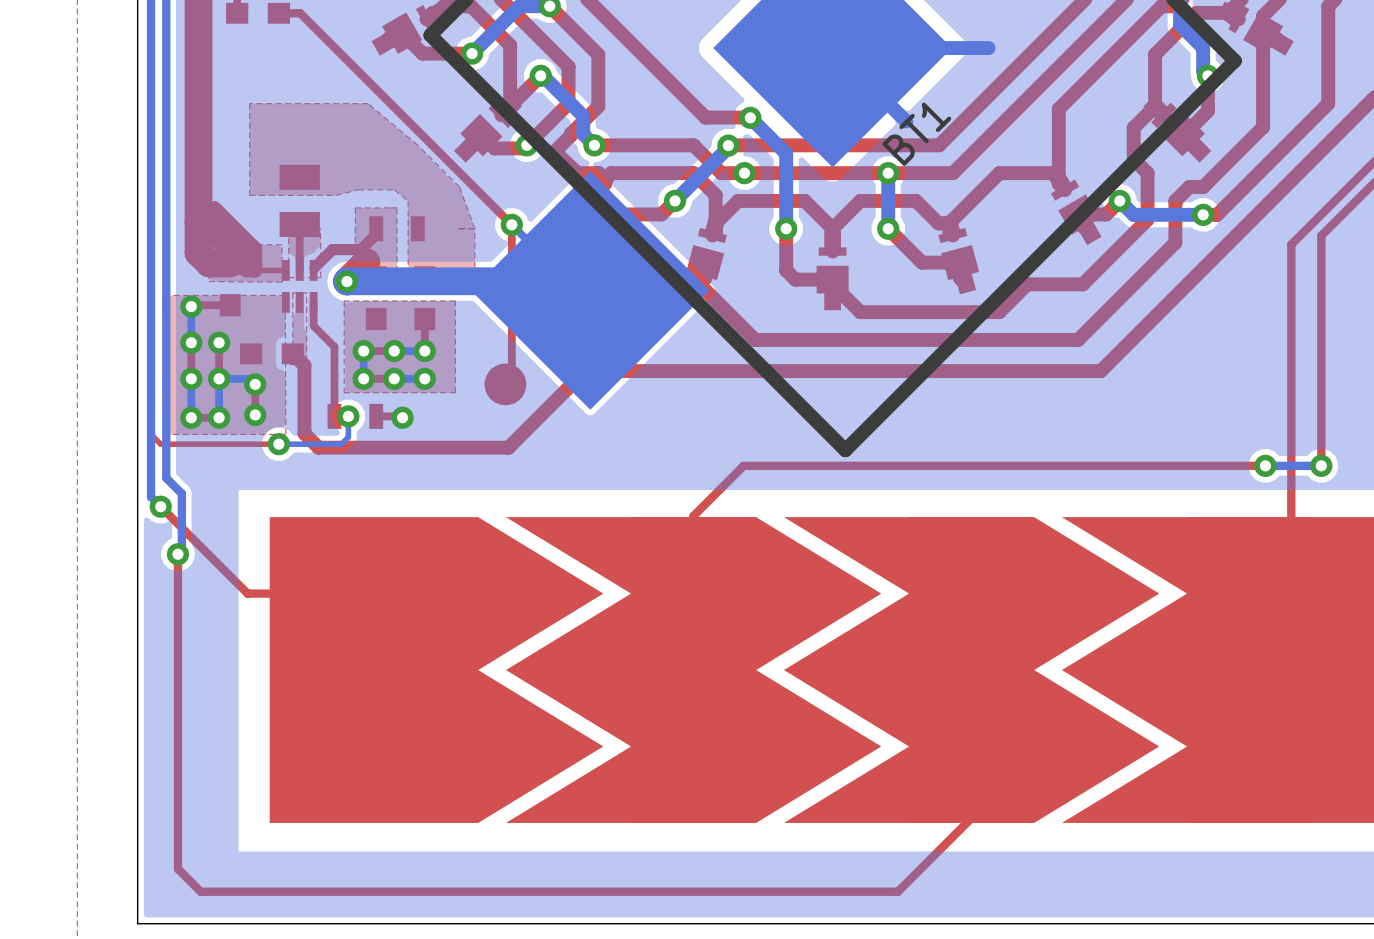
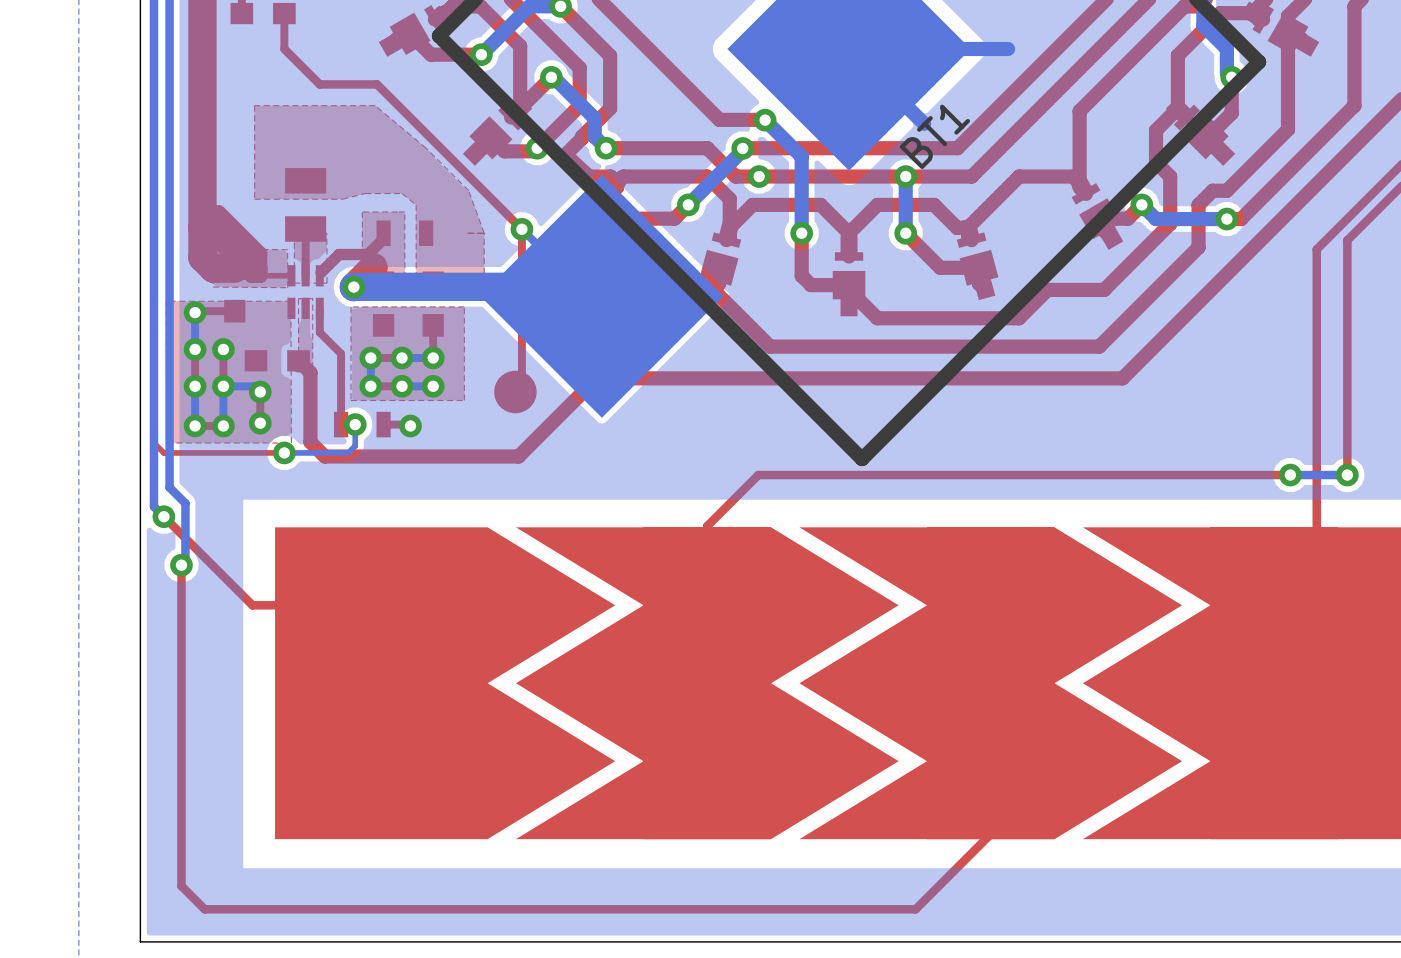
top track: (278, 13) (300, 13) (369, 82) -> (284, 13) (284, 49) (319, 84) (377, 84)

